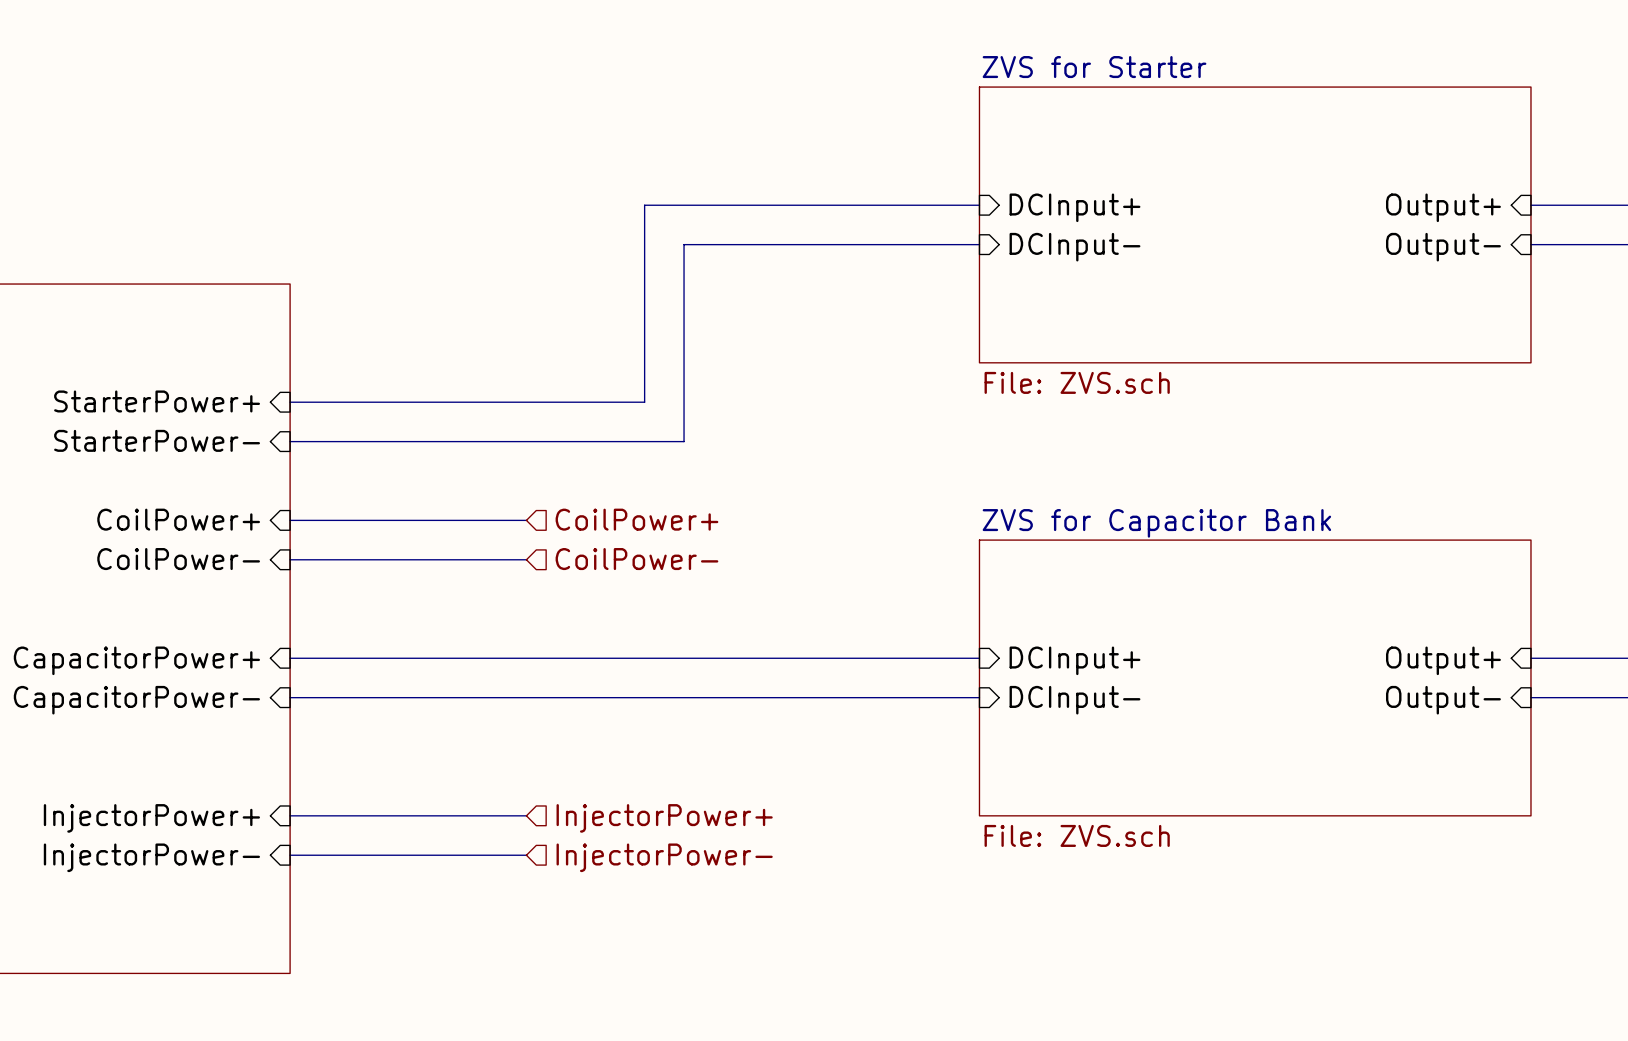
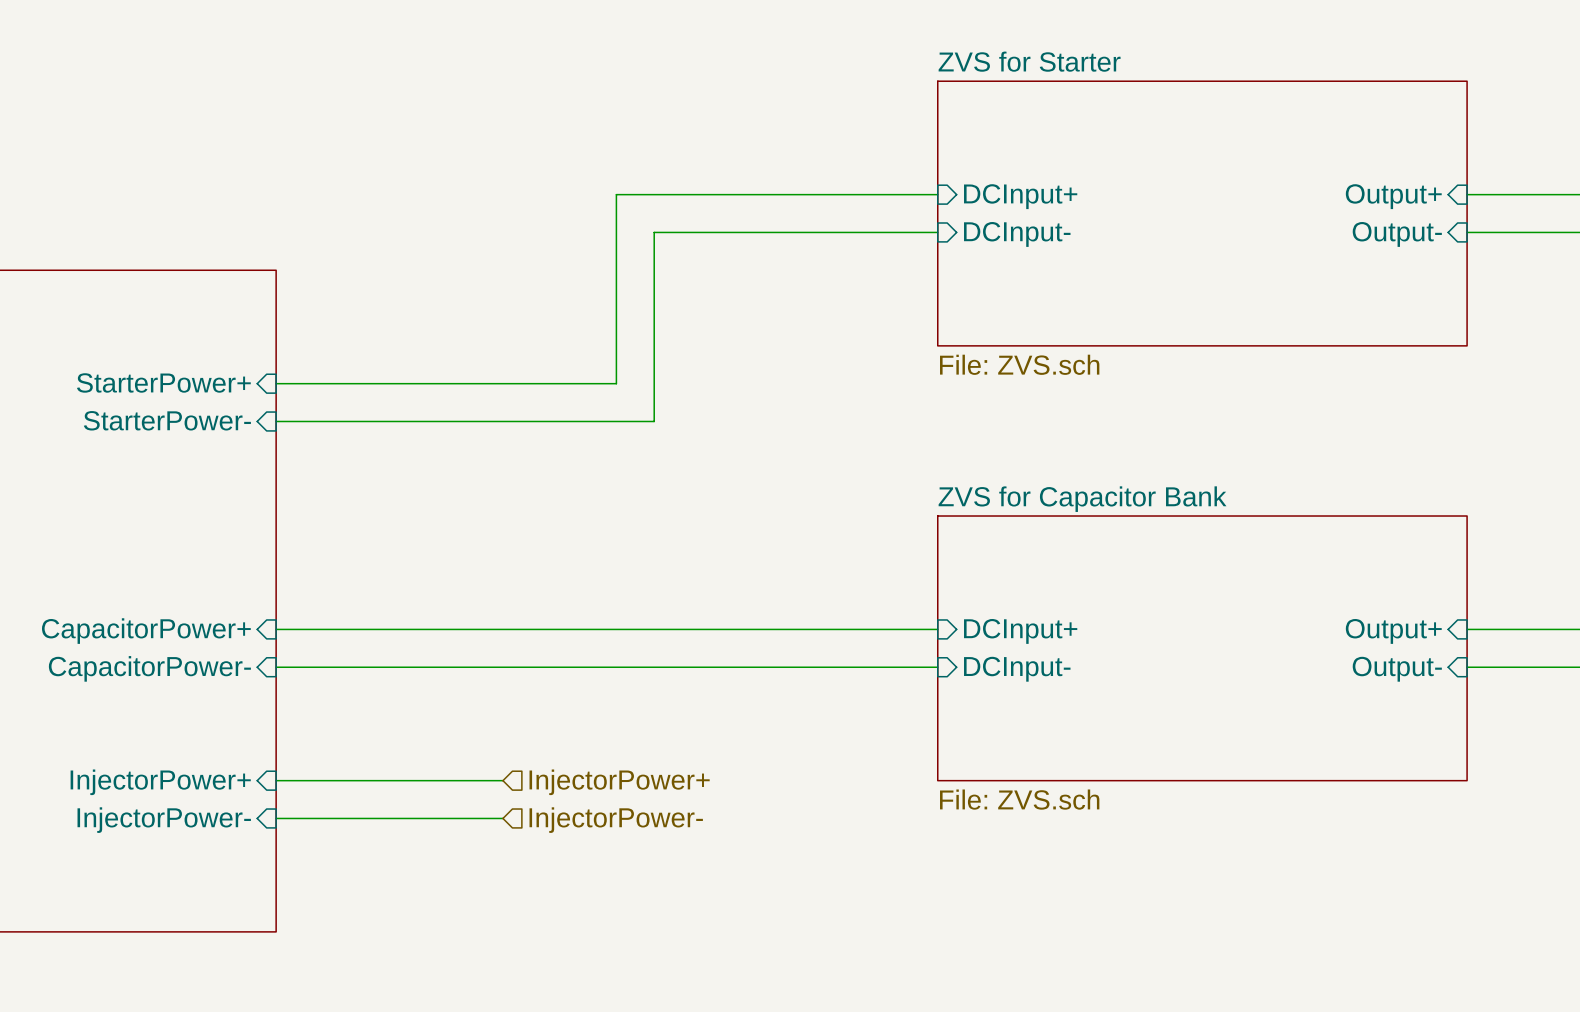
sheet pin: CoilPower+ (178, 519) -> none
hierarchical label: CoilPower+ (636, 519) -> none
wire: (290, 520) (526, 520) -> none
sheet pin: CoilPower- (178, 559) -> none
wire: (290, 559) (526, 559) -> none
hierarchical label: CoilPower- (636, 559) -> none

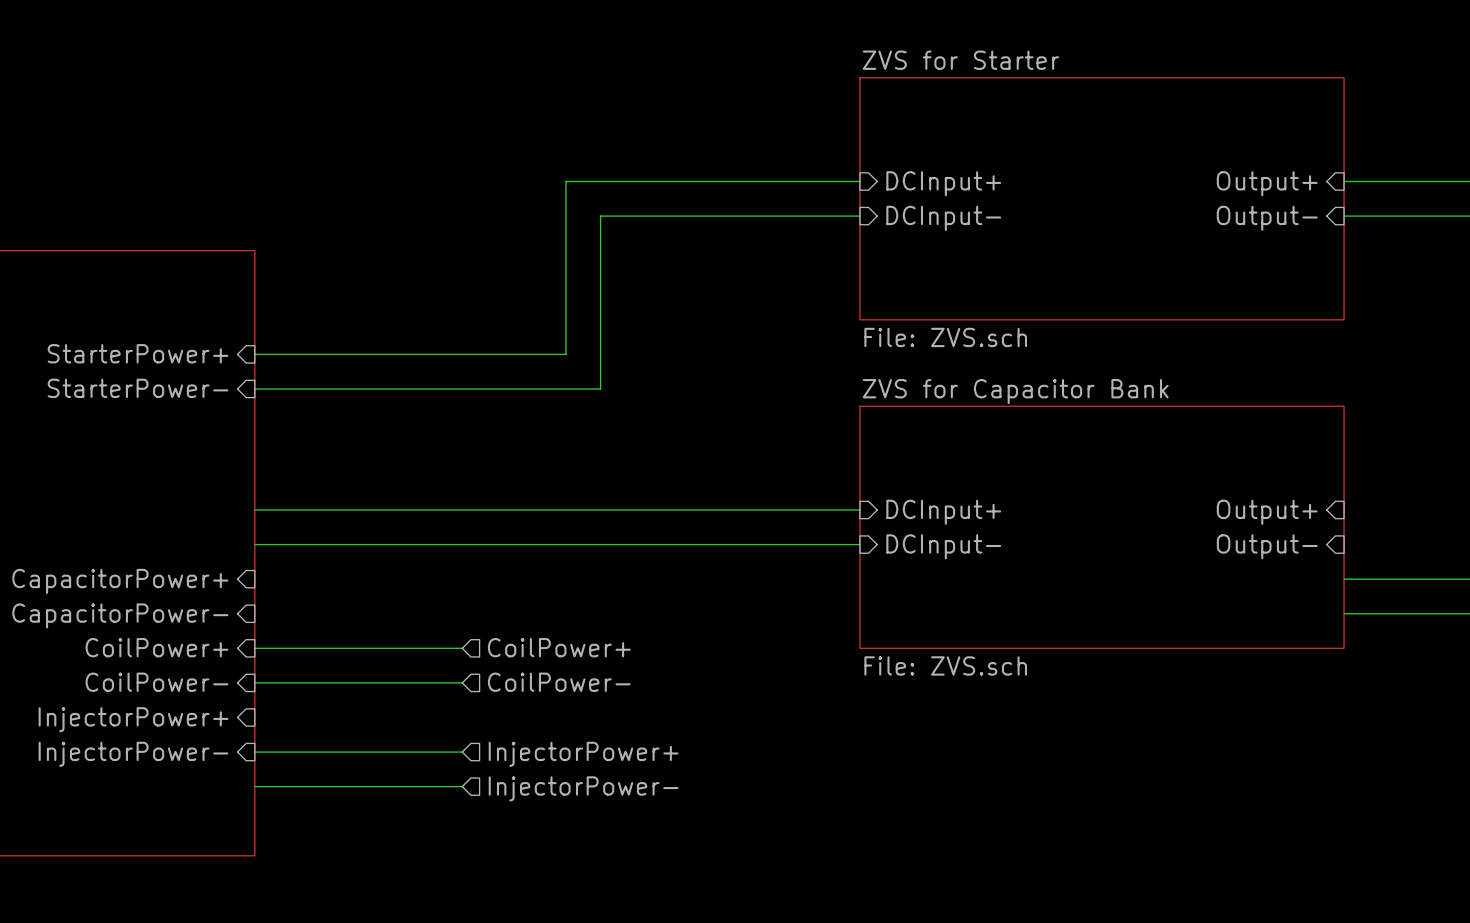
wire: (276, 629) (937, 629) -> (254, 510) (859, 510)
sheet pin position: DCInput+ (1020, 631) -> DCInput+ (943, 512)
sheet pin position: Output+ (1393, 631) -> Output+ (1267, 512)
sheet ZVS for Capacitor Bank position: (1202, 648) -> (1102, 527)
wire: (276, 667) (937, 667) -> (254, 544) (859, 544)
sheet pin position: DCInput- (1017, 669) -> DCInput- (943, 546)
sheet pin position: Output- (1397, 669) -> Output- (1267, 546)
sheet pin: none -> CoilPower+ (156, 647)
hierarchical label: none -> CoilPower+ (559, 647)
sheet pin: none -> CoilPower- (156, 682)
hierarchical label: none -> CoilPower- (559, 682)
wire: none -> (254, 682) (462, 682)
wire: (276, 780) (502, 780) -> (254, 648) (462, 648)
hierarchical label: InjectorPower+ (619, 782) -> none
hierarchical label: InjectorPower- (616, 820) -> InjectorPower+ (583, 754)
wire: none -> (254, 786) (462, 786)
hierarchical label: none -> InjectorPower- (583, 788)

